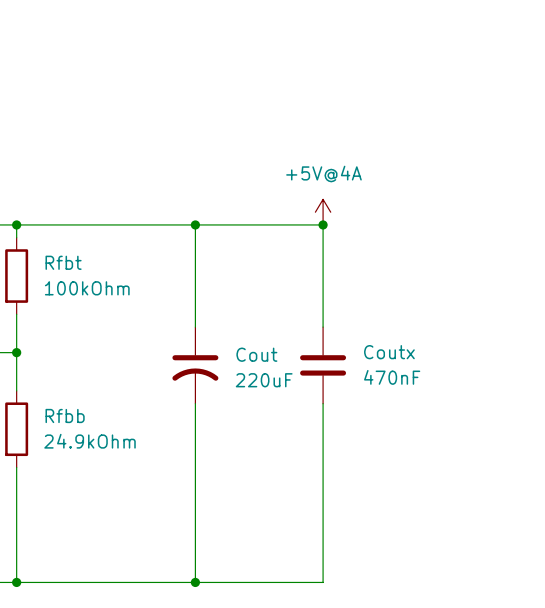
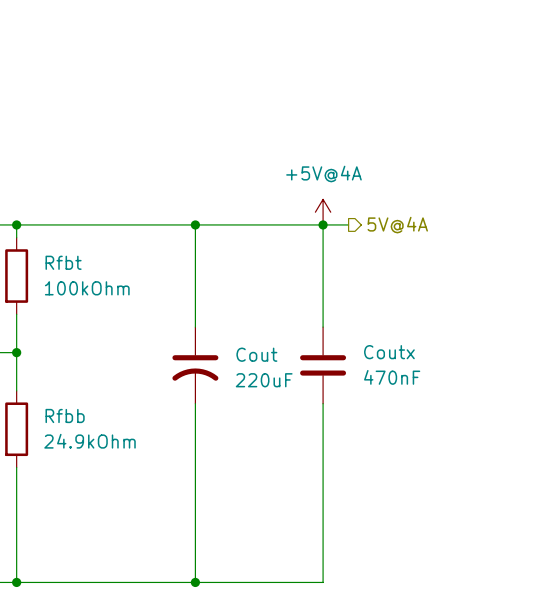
wire: none -> (323, 224) (348, 224)
hierarchical label: none -> 5V@4A (397, 225)

